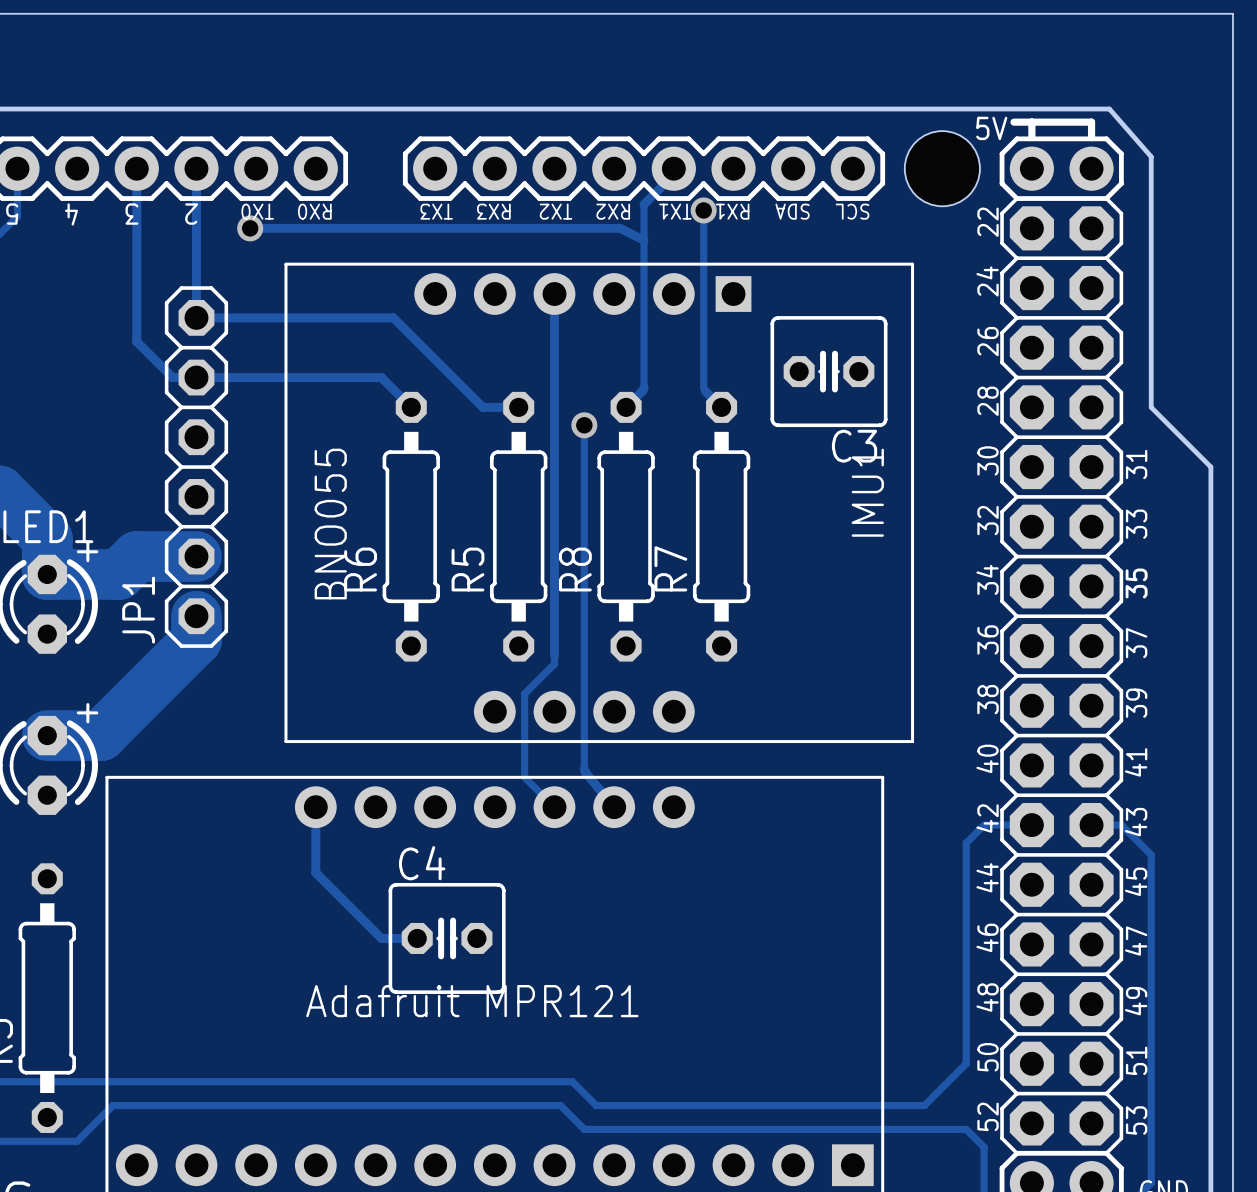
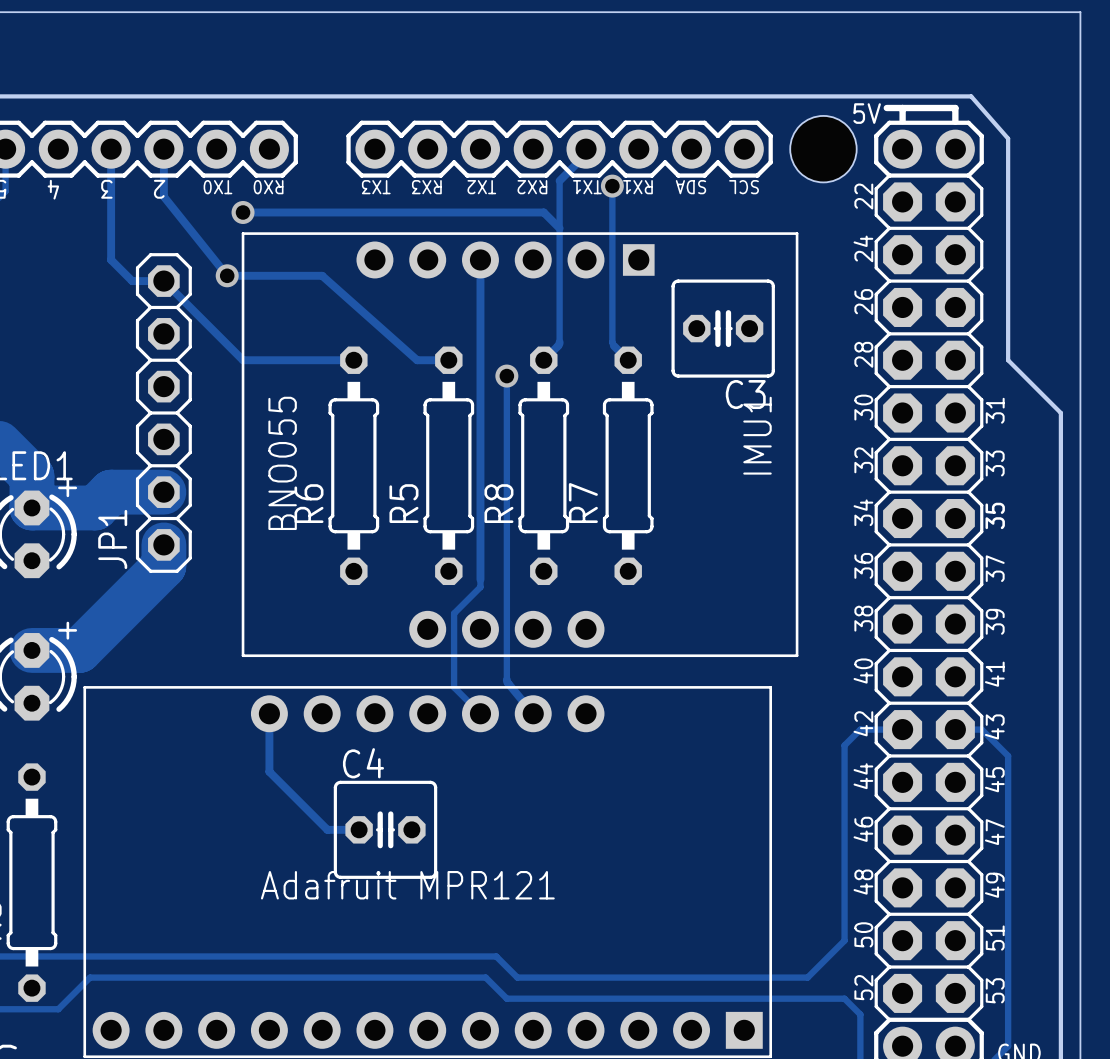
track: (196, 222) (196, 317) (393, 317) (482, 407) -> (163, 196) (227, 275) (322, 275) (417, 360)
track: (250, 228) (620, 228) (644, 240) -> none
via position: (250, 228) -> (243, 212)
track: none -> (243, 212) (543, 212) (559, 228)
track: (136, 294) (136, 341) (172, 377) (381, 377) (411, 407) -> (111, 259) (132, 281) (163, 281) (243, 360) (353, 360)
via: none -> (227, 275)

